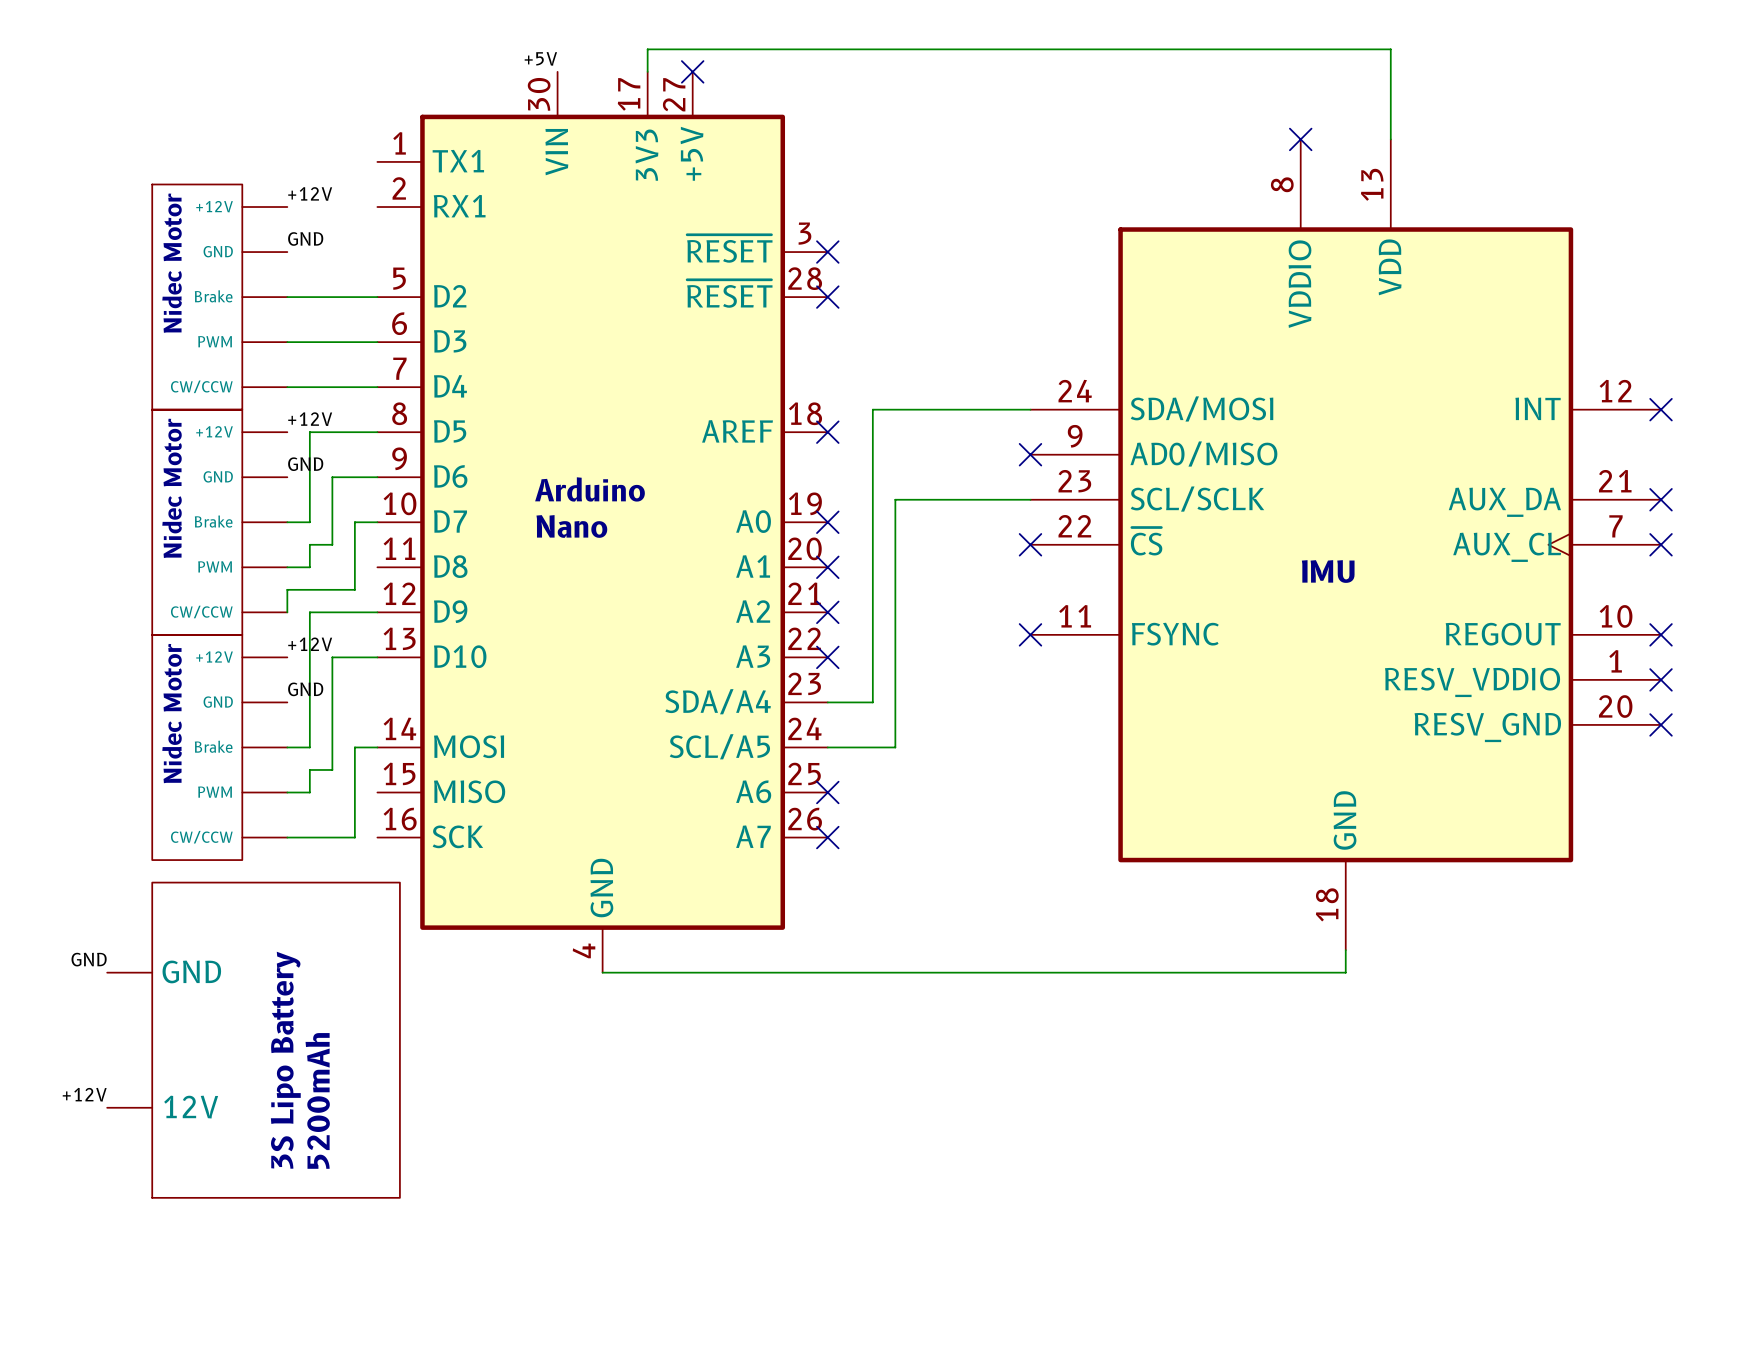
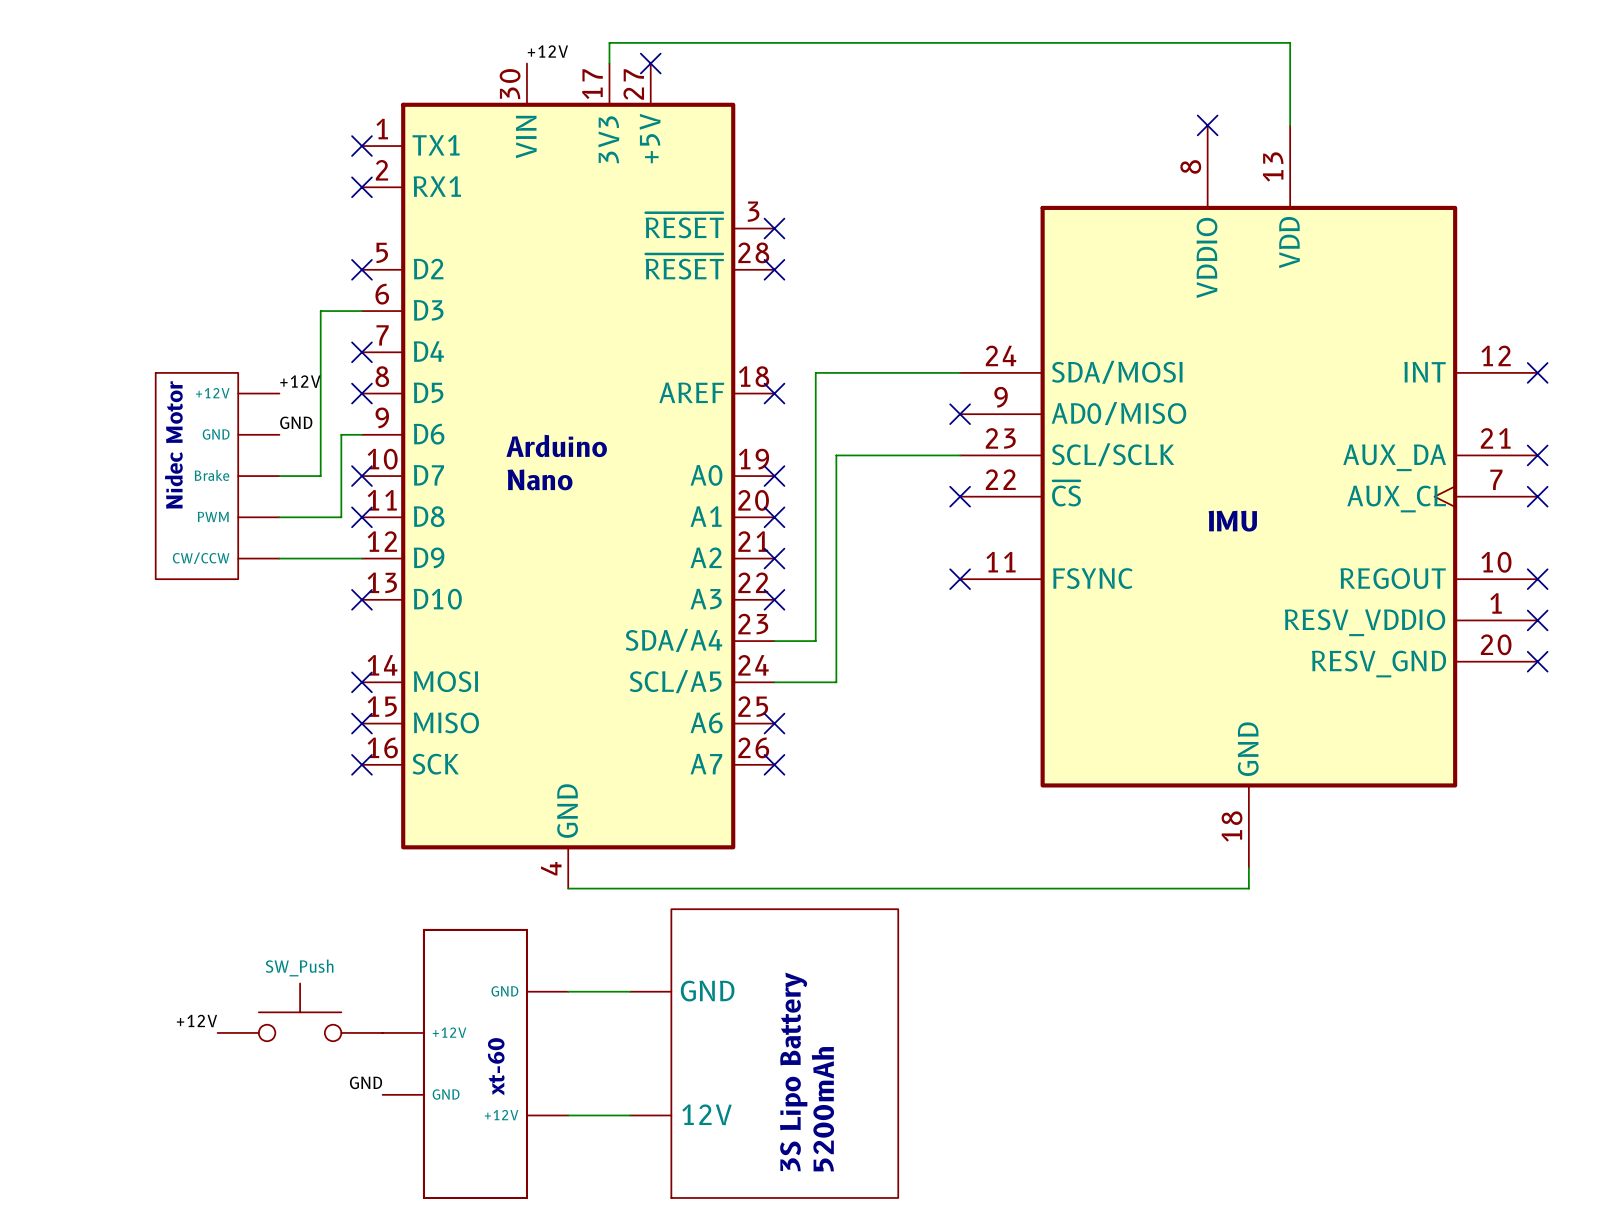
label: +5V (540, 58) -> +12V (547, 51)
no-connect mark: none -> (361, 146)
label: +12V (310, 193) -> none
no-connect mark: none -> (361, 187)
label: GND (305, 238) -> none
text: Nidec Motor (172, 263) -> none
part: (219, 297) -> none
wire: (287, 297) (377, 297) -> none
no-connect mark: none -> (361, 269)
wire: (287, 342) (332, 342) -> none
wire: (287, 387) (377, 387) -> none
no-connect mark: none -> (361, 352)
wire: (377, 432) (309, 432) (309, 522) -> none
no-connect mark: none -> (361, 393)
wire: (332, 477) (354, 477) -> (320, 434) (320, 311)
wire: (332, 522) (332, 544) (309, 544) (309, 567) -> (320, 476) (300, 476)
wire: (354, 522) (377, 522) -> (341, 476) (341, 434)
no-connect mark: none -> (361, 476)
wire: (354, 567) (354, 589) (287, 589) (287, 612) -> (341, 517) (300, 517)
no-connect mark: none -> (361, 517)
wire: (309, 612) (309, 747) (287, 747) -> (300, 558) (279, 558)
label: +12V (310, 644) -> none
wire: (377, 657) (332, 657) (332, 769) (309, 769) (309, 792) (287, 792) -> none
no-connect mark: none -> (361, 599)
label: GND (305, 689) -> none
text: Nidec Motor (172, 713) -> none
part: (219, 747) -> none
wire: (377, 747) (354, 747) (354, 837) (287, 837) -> none
no-connect mark: none -> (361, 682)
no-connect mark: none -> (361, 723)
no-connect mark: none -> (361, 764)
label: GND (89, 959) -> none
part: (253, 1040) -> none
text: 3S Lipo Battery (285, 1060) -> none
wire: none -> (568, 991) (630, 991)
label position: +12V (84, 1094) -> +12V (196, 1021)
text: 5200mAh (317, 1100) -> none
part: none -> SW_Push (300, 1012)
part: none -> (764, 1053)
part: none -> (475, 1063)
text: none -> xt-60 (496, 1066)
text: none -> 3S Lipo Battery (793, 1071)
label: none -> GND (366, 1082)
text: none -> 5200mAh (822, 1109)
wire: none -> (568, 1115) (630, 1115)

